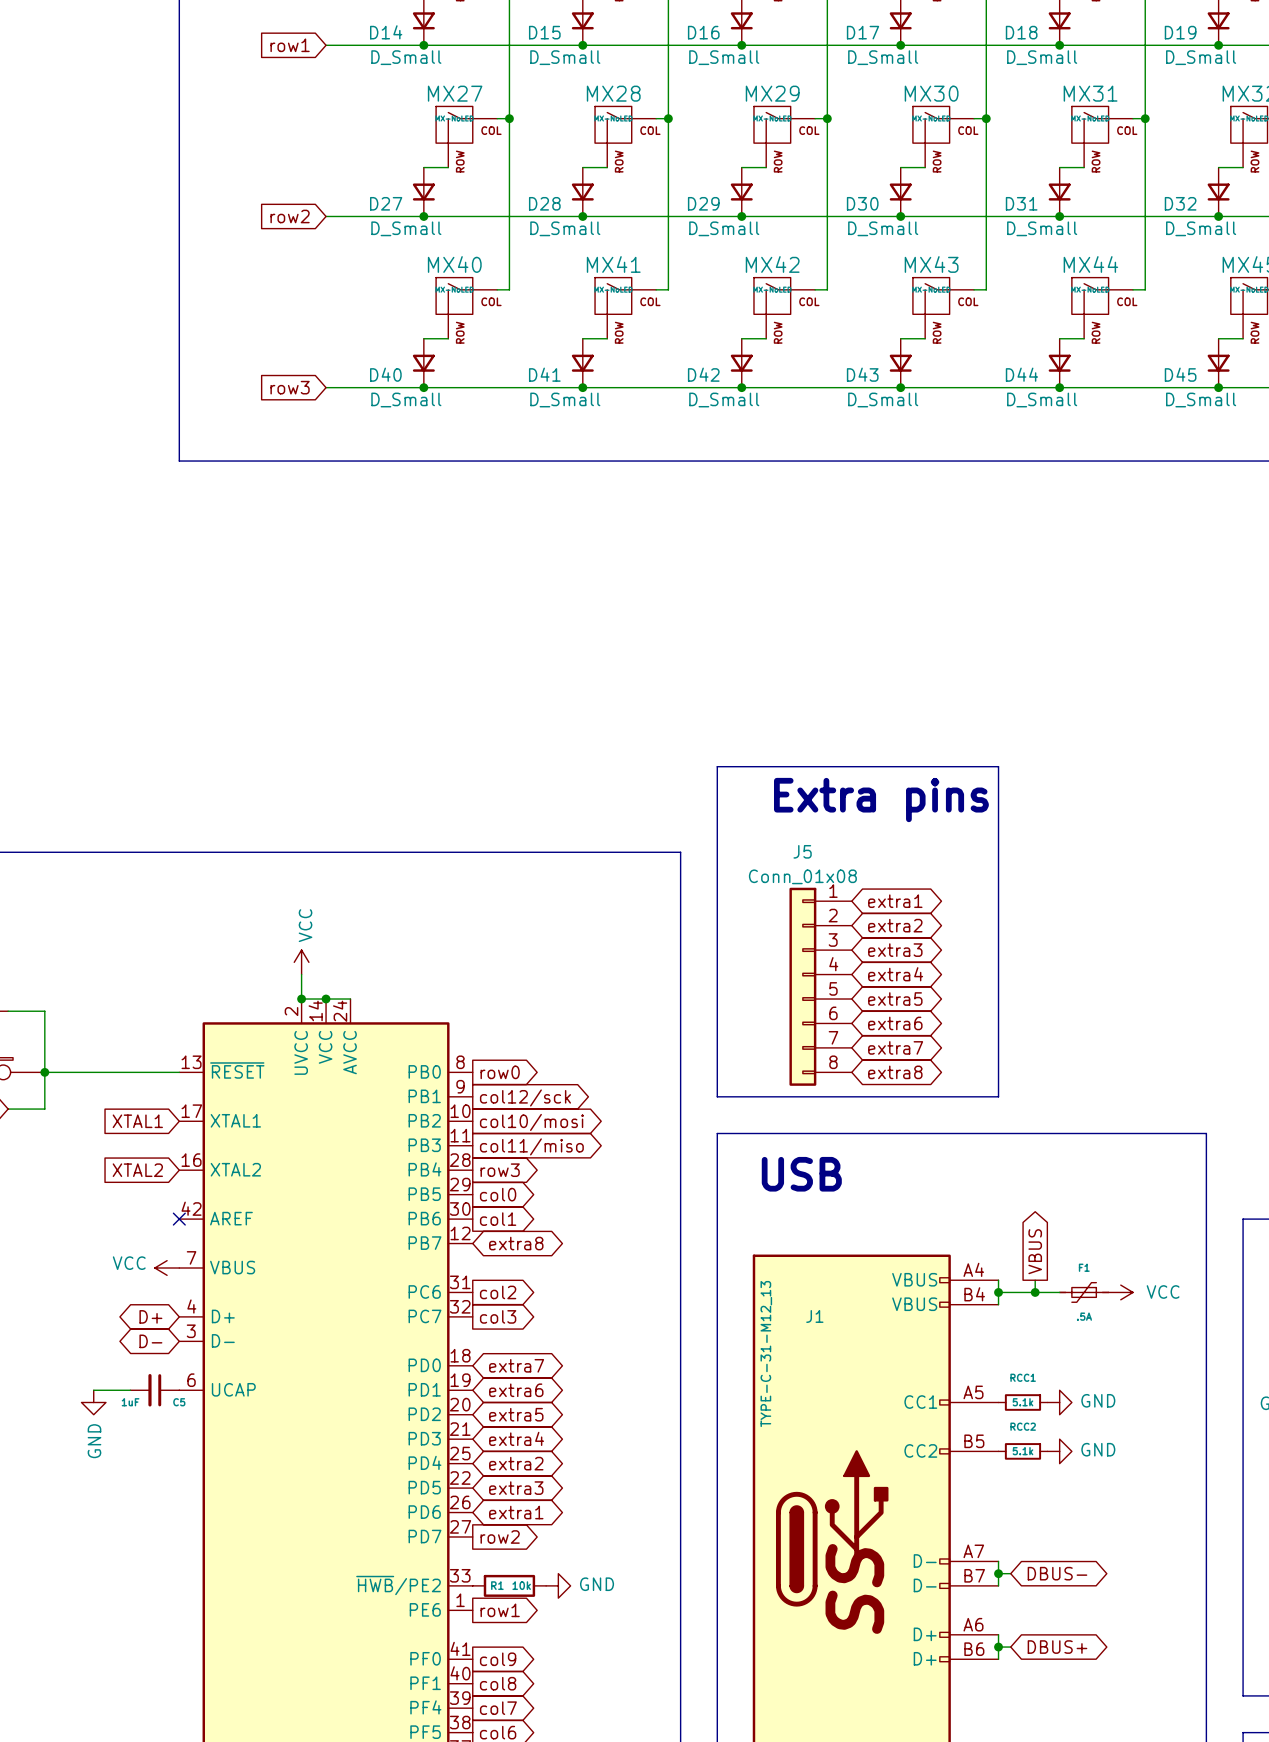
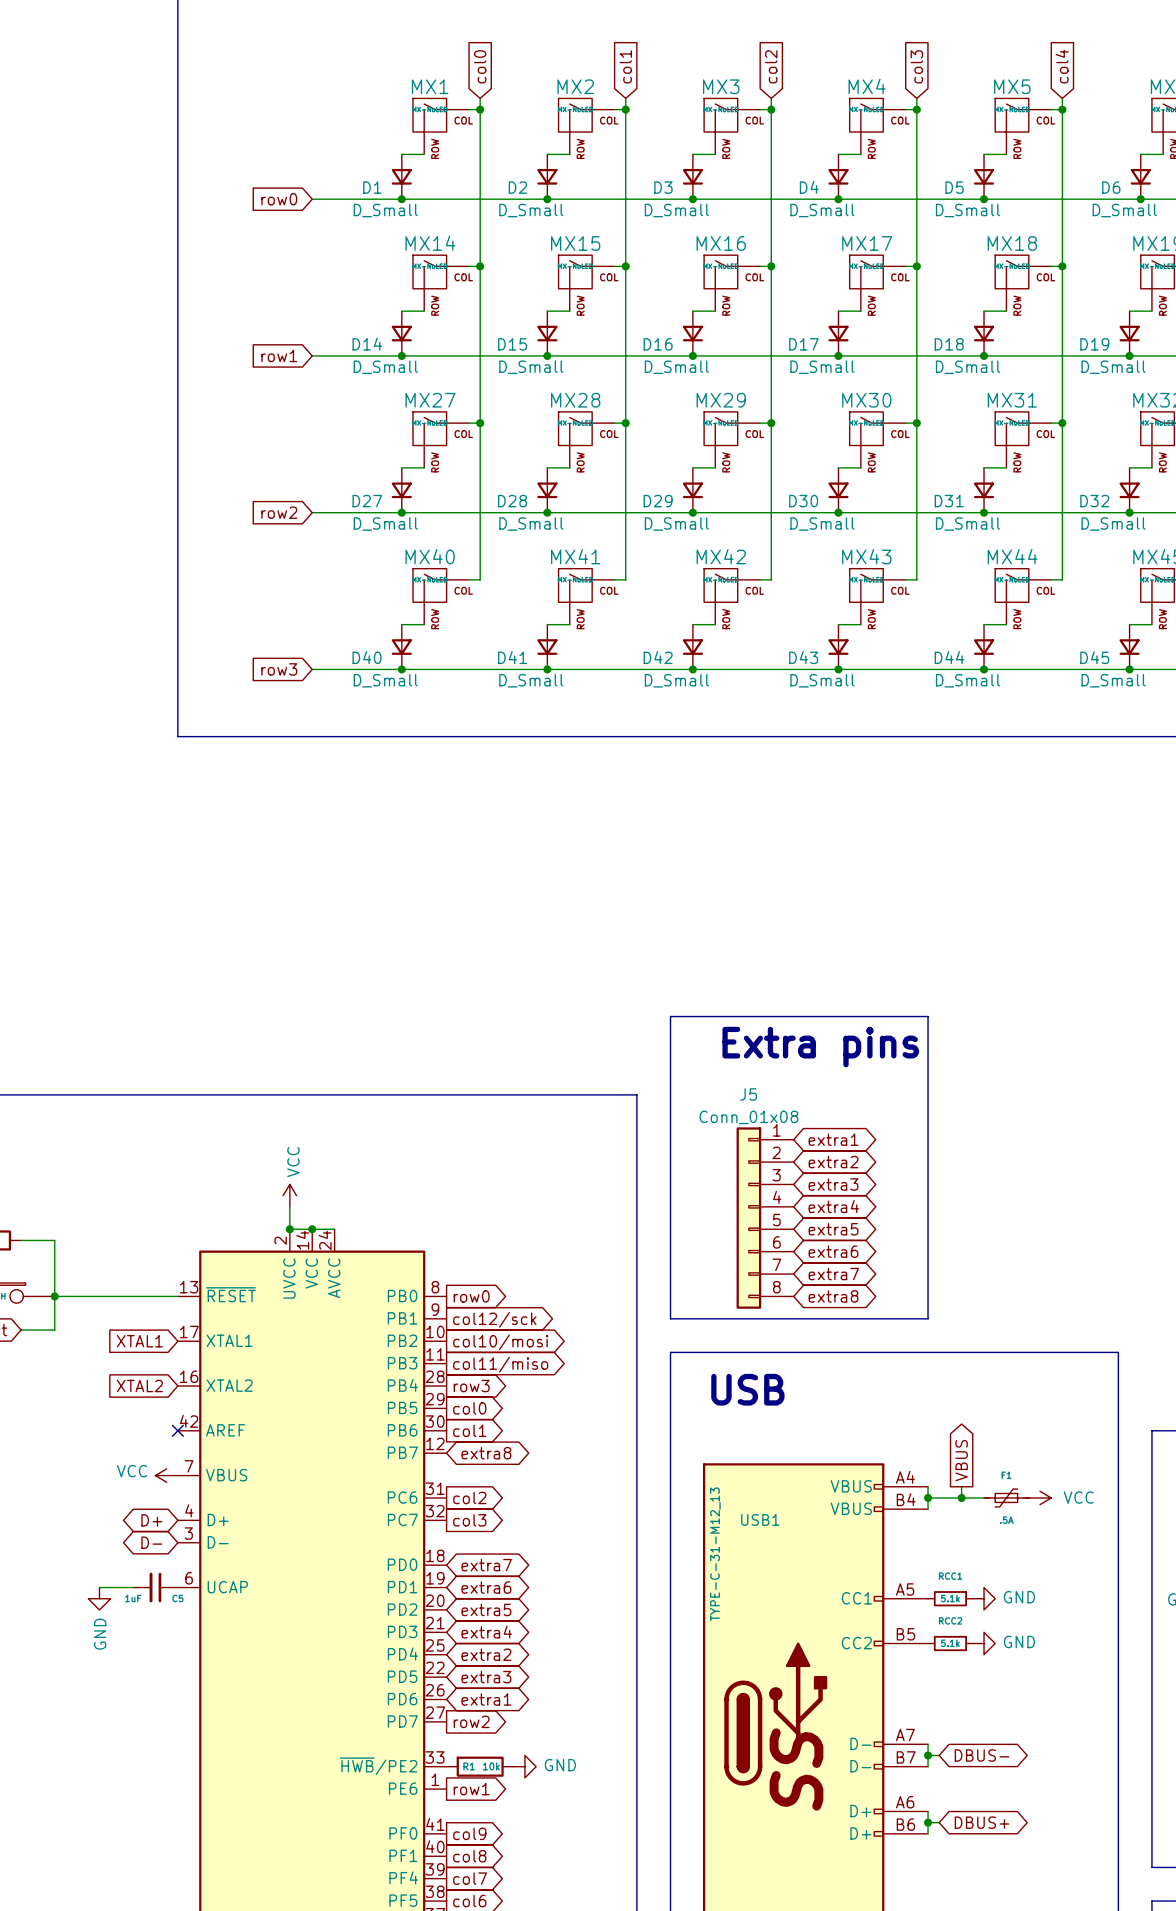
J1 name: J1 (814, 1316) -> USB1 (760, 1519)

